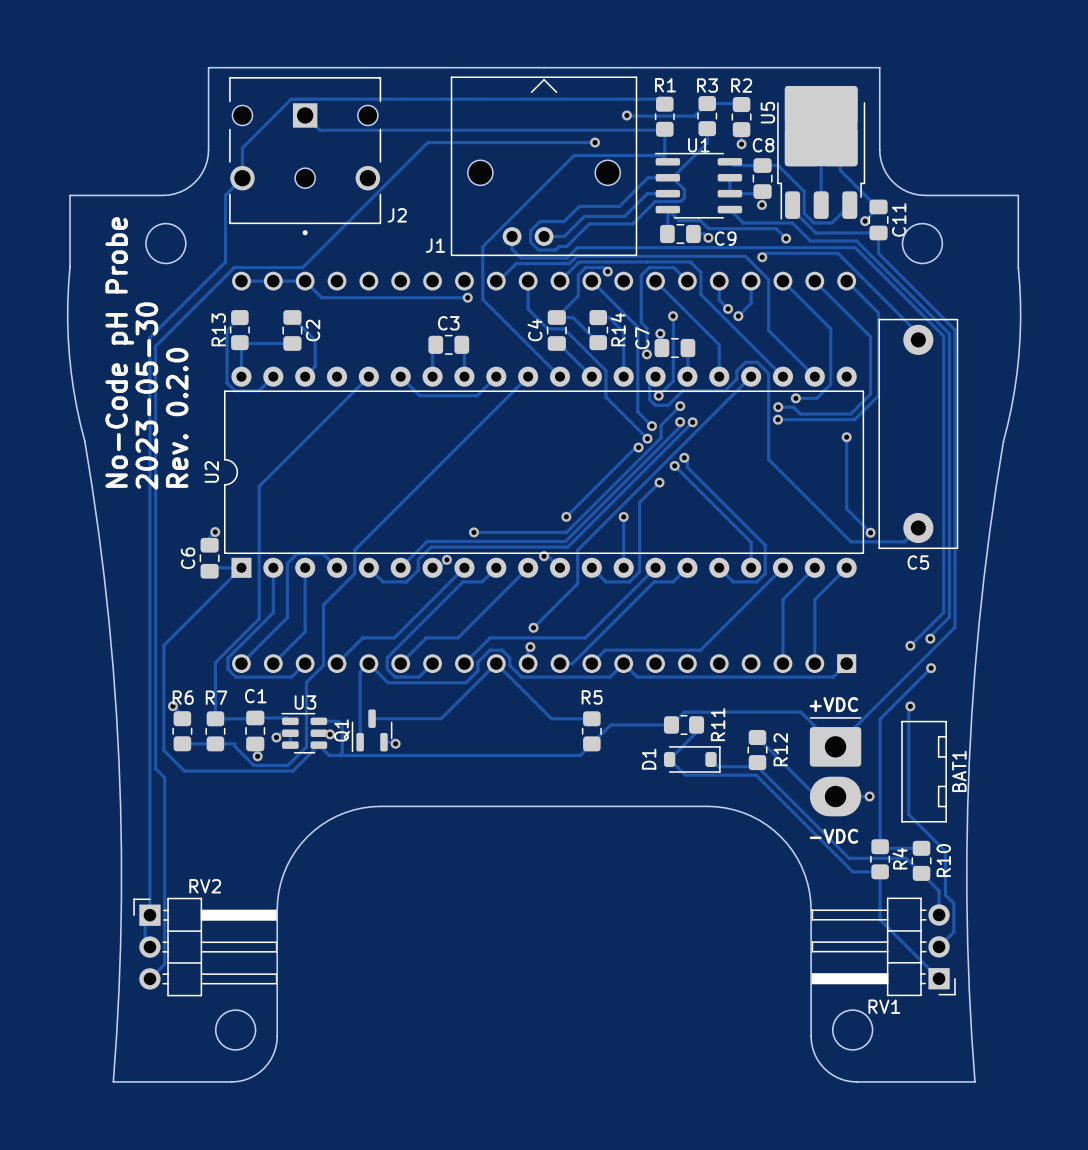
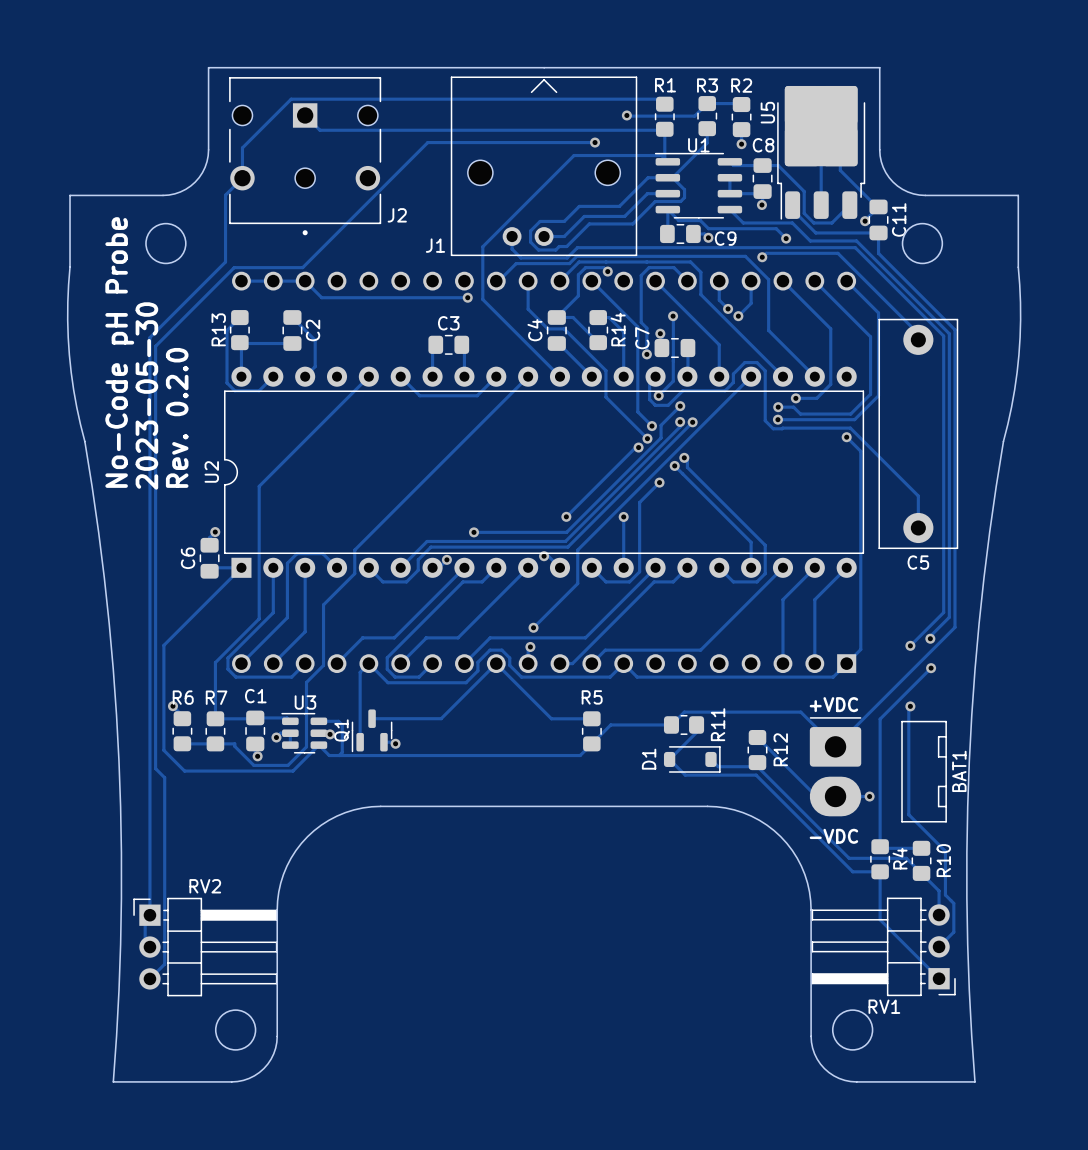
track: (733, 382) (736, 379) (736, 371) (745, 362) (757, 362) (768, 373) (768, 459) (850, 541) (904, 541) (918, 527) -> (733, 382) (733, 374) (744, 362) (756, 362) (765, 370) (765, 420) (773, 428) (850, 428) (918, 496) (918, 527)
track: (846, 437) (846, 508) (870, 532) -> (846, 437) (860, 451) (860, 649) (846, 663)
via: (870, 532) -> none

